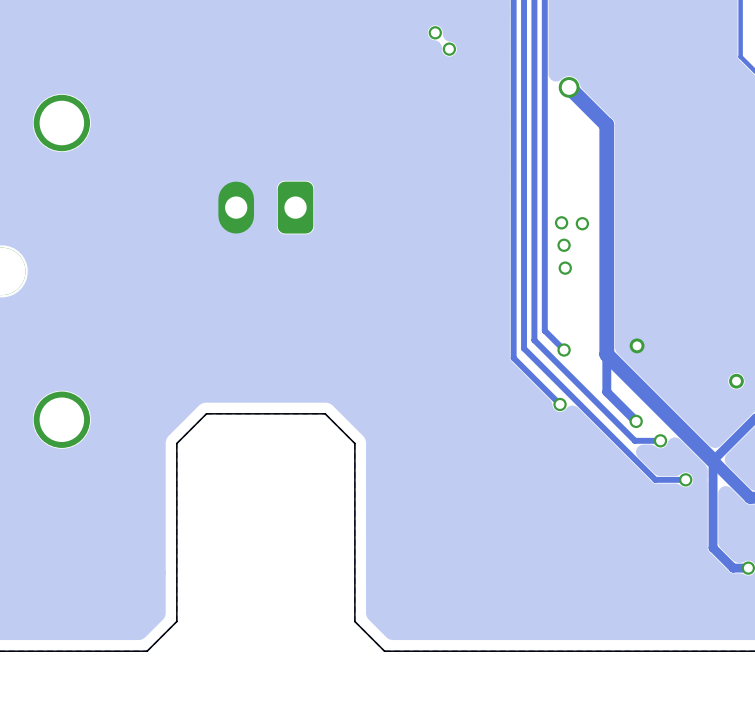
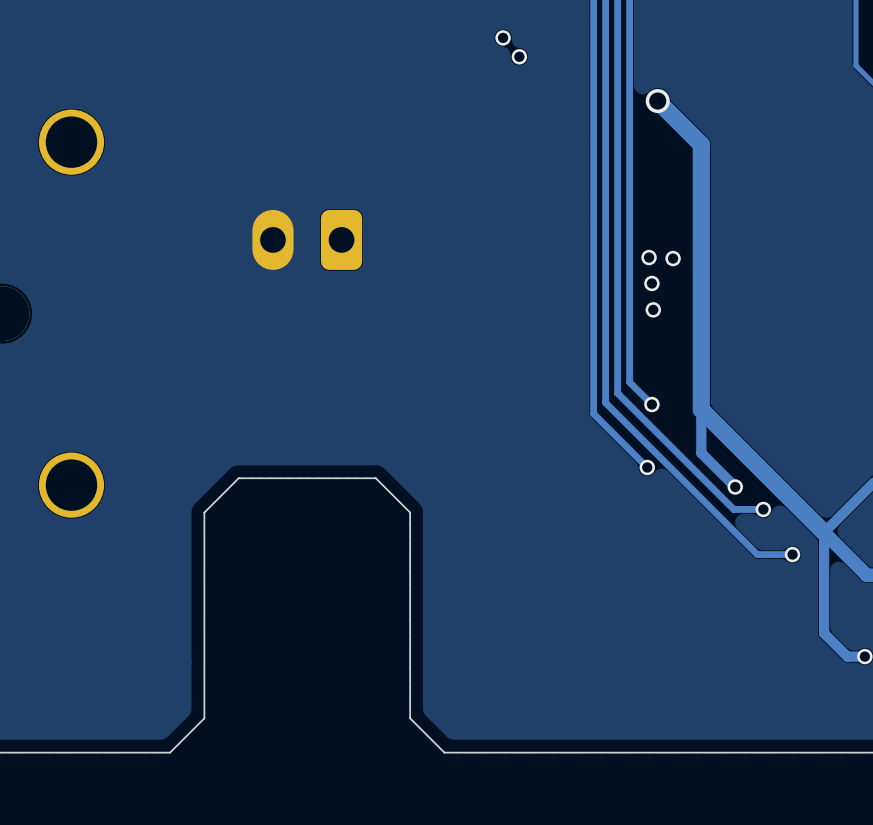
via: (637, 345) -> none
via: (736, 381) -> none

